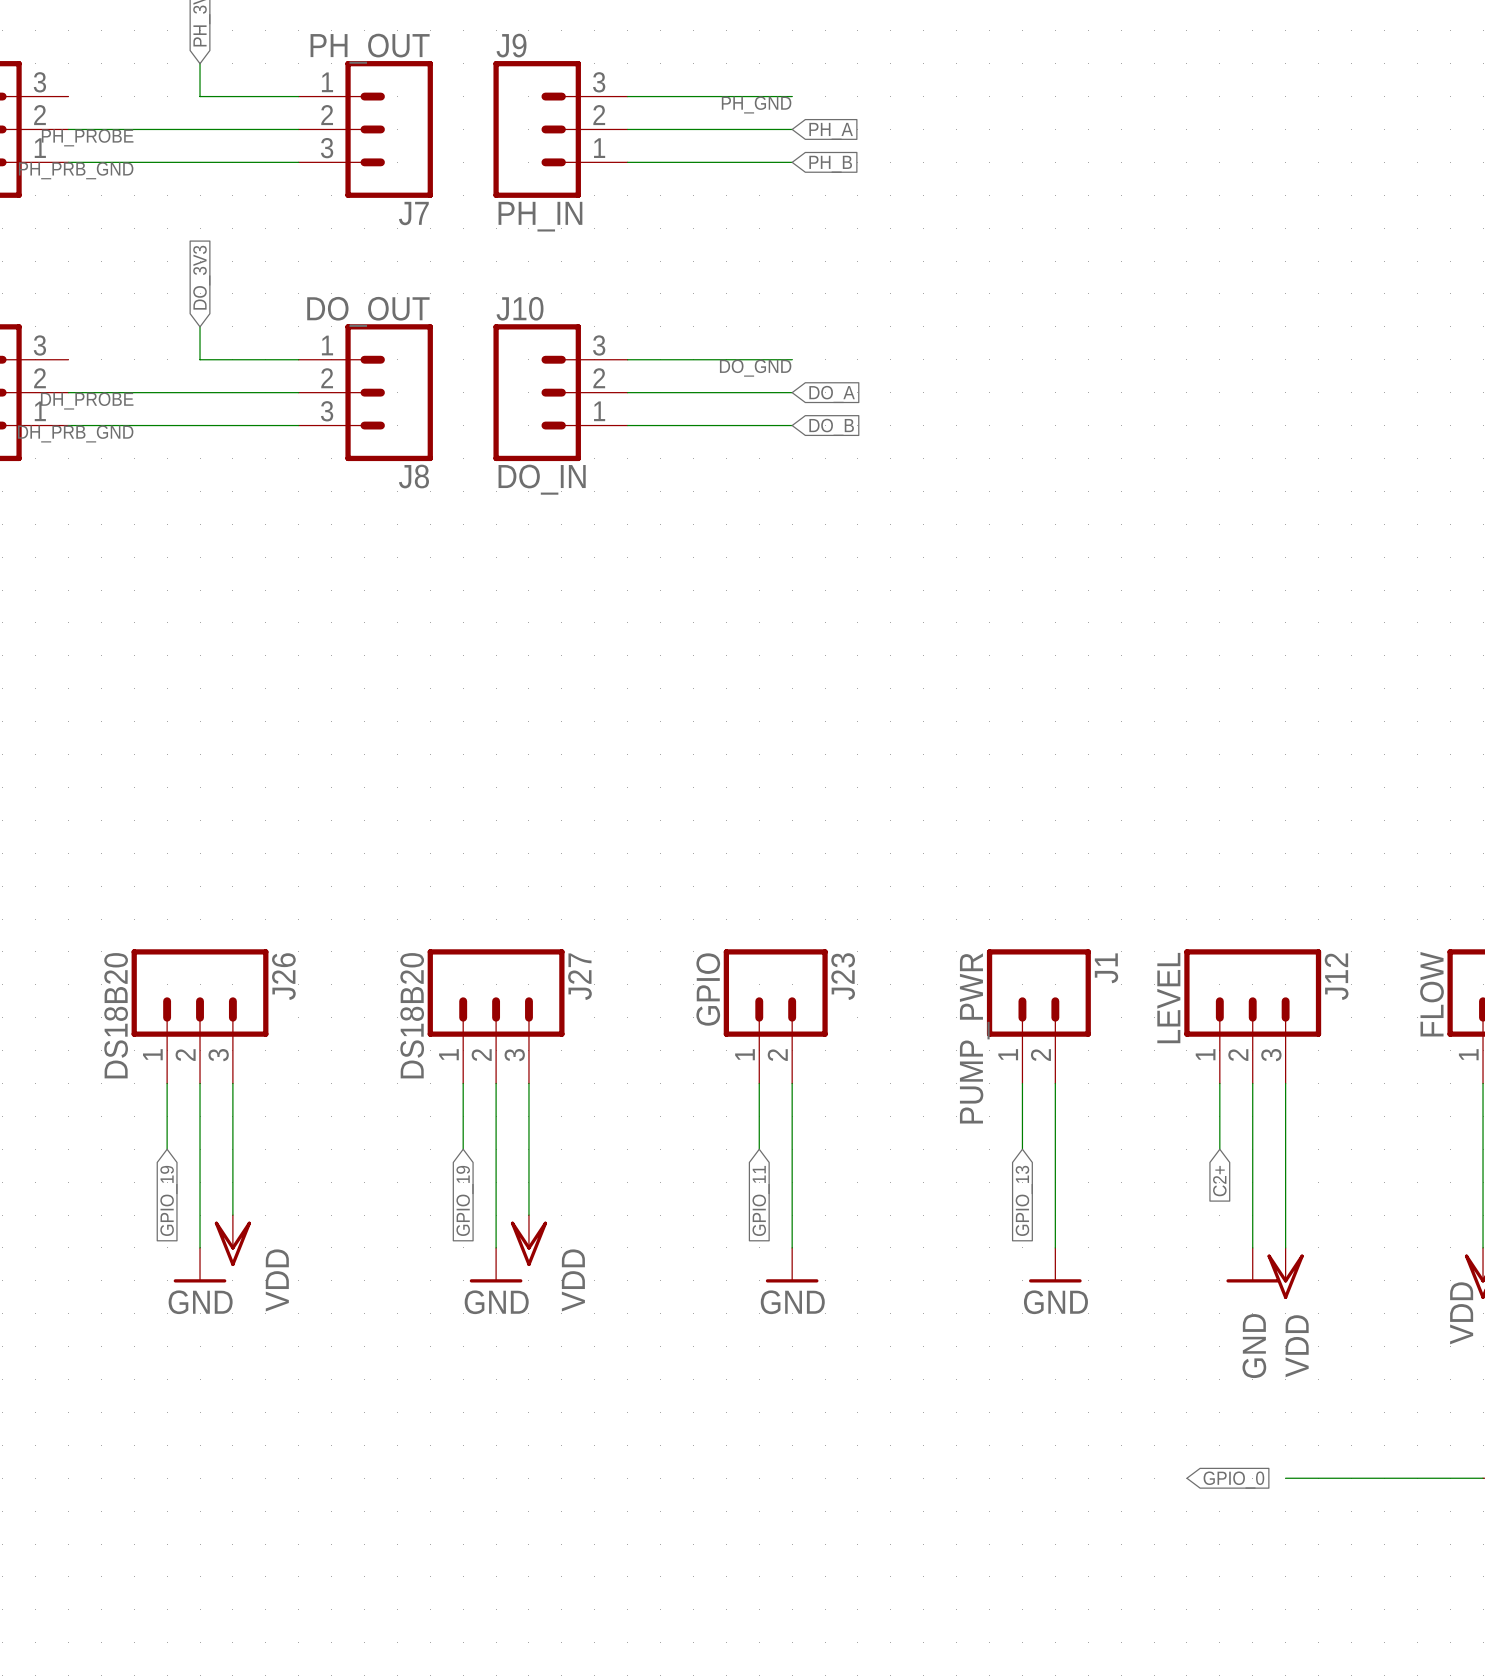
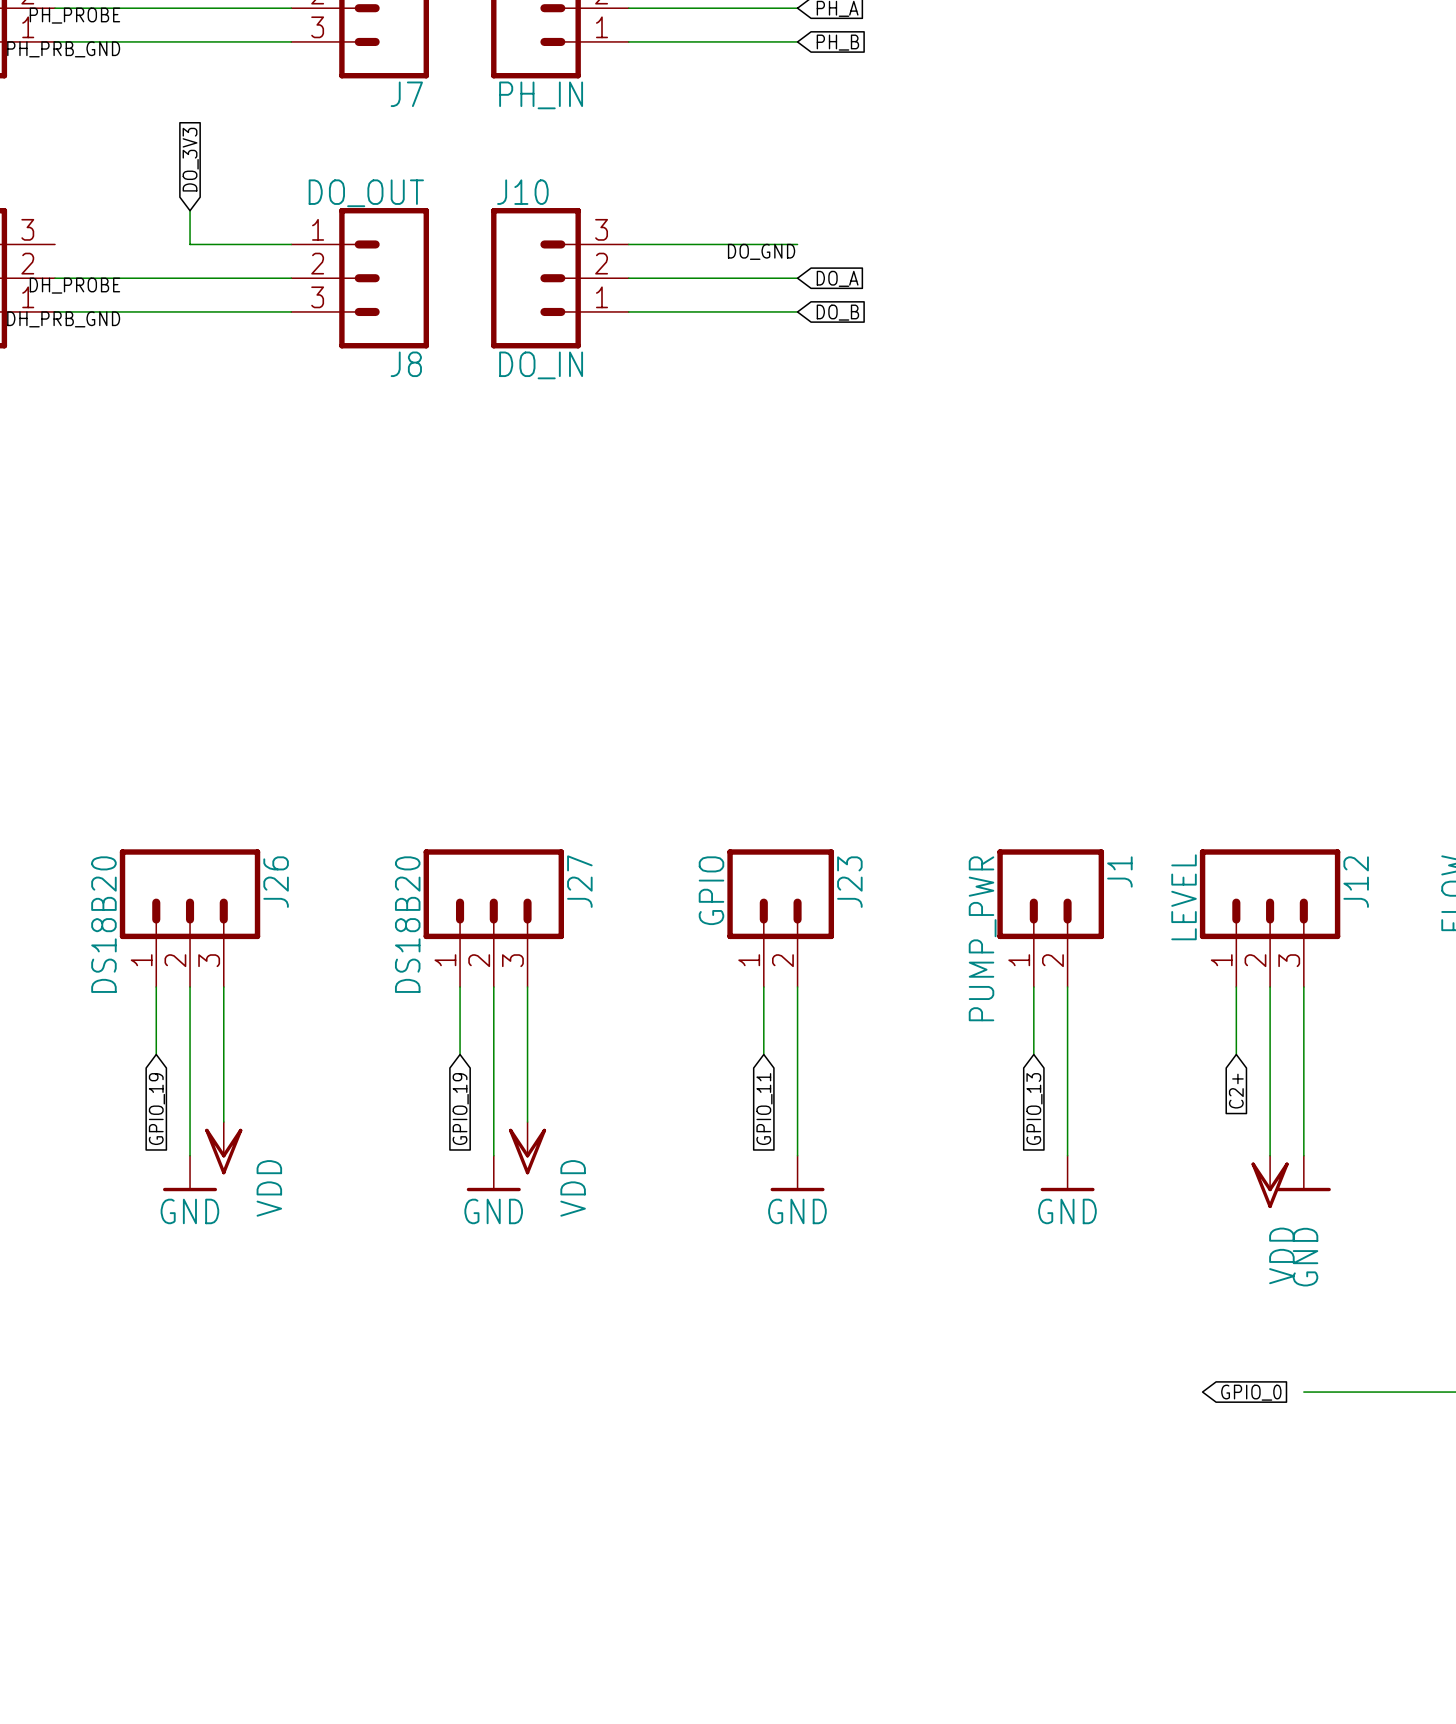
power symbol: GND (1252, 1265) -> VDD (1270, 1181)
power symbol: VDD (1285, 1273) -> GND (1303, 1173)

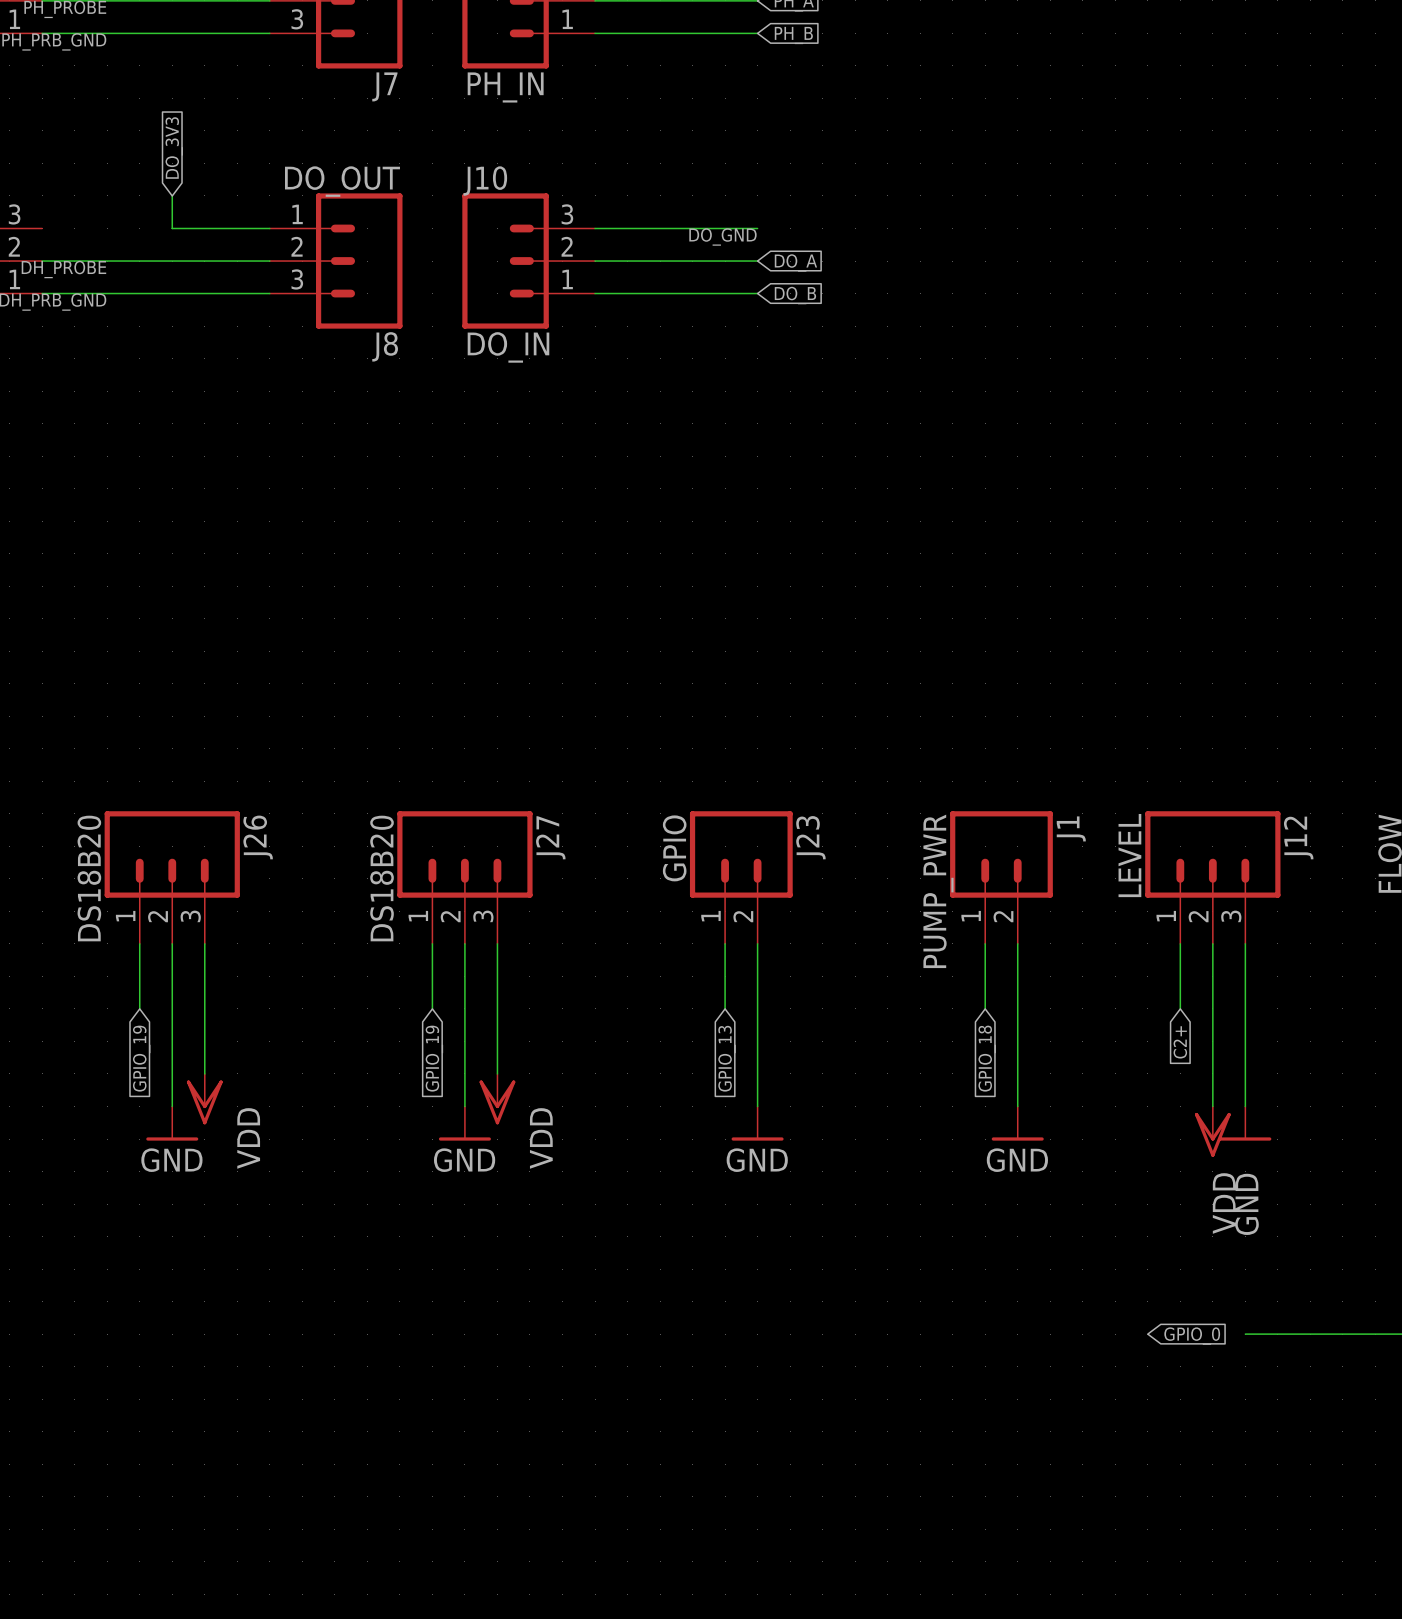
global label: GPIO_11 (764, 1109) -> GPIO_13 (727, 1058)
global label: GPIO_13 (1034, 1109) -> GPIO_18 (987, 1058)

